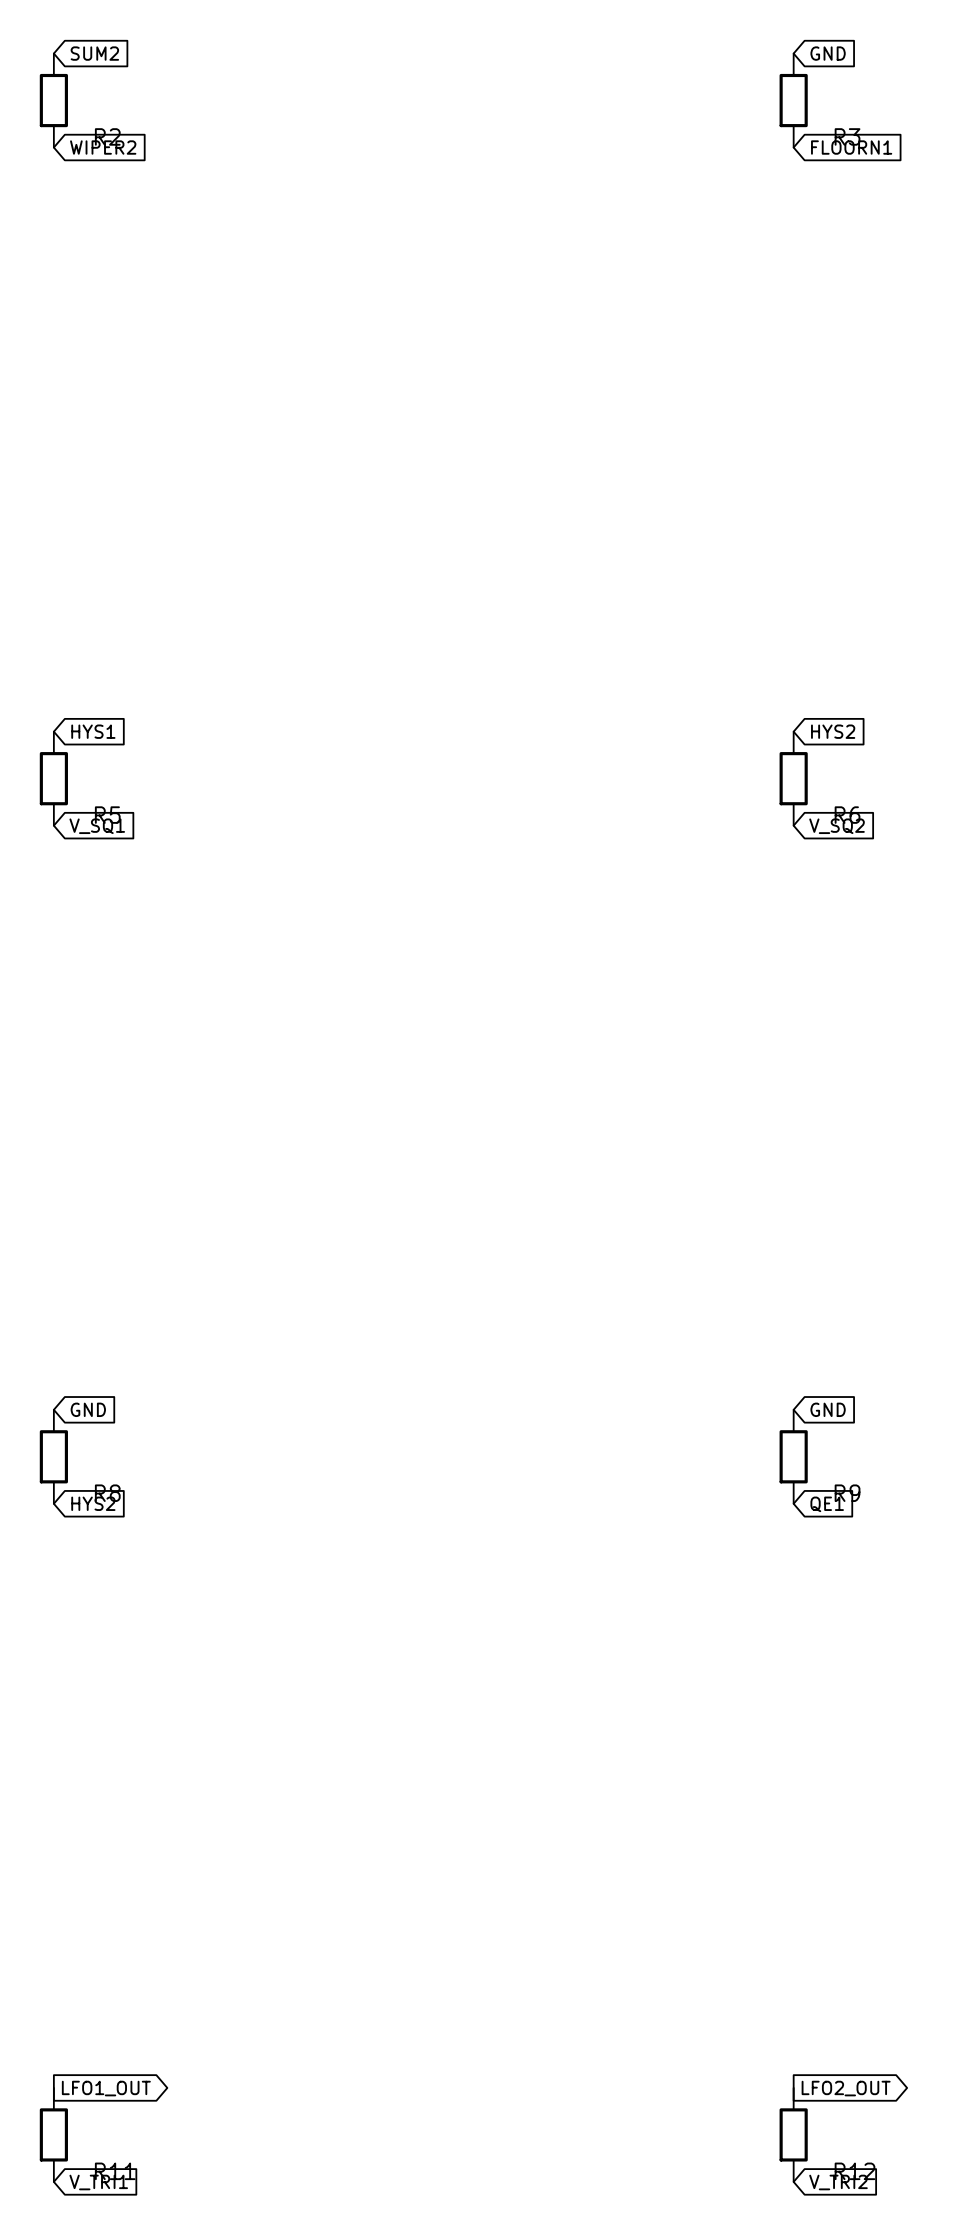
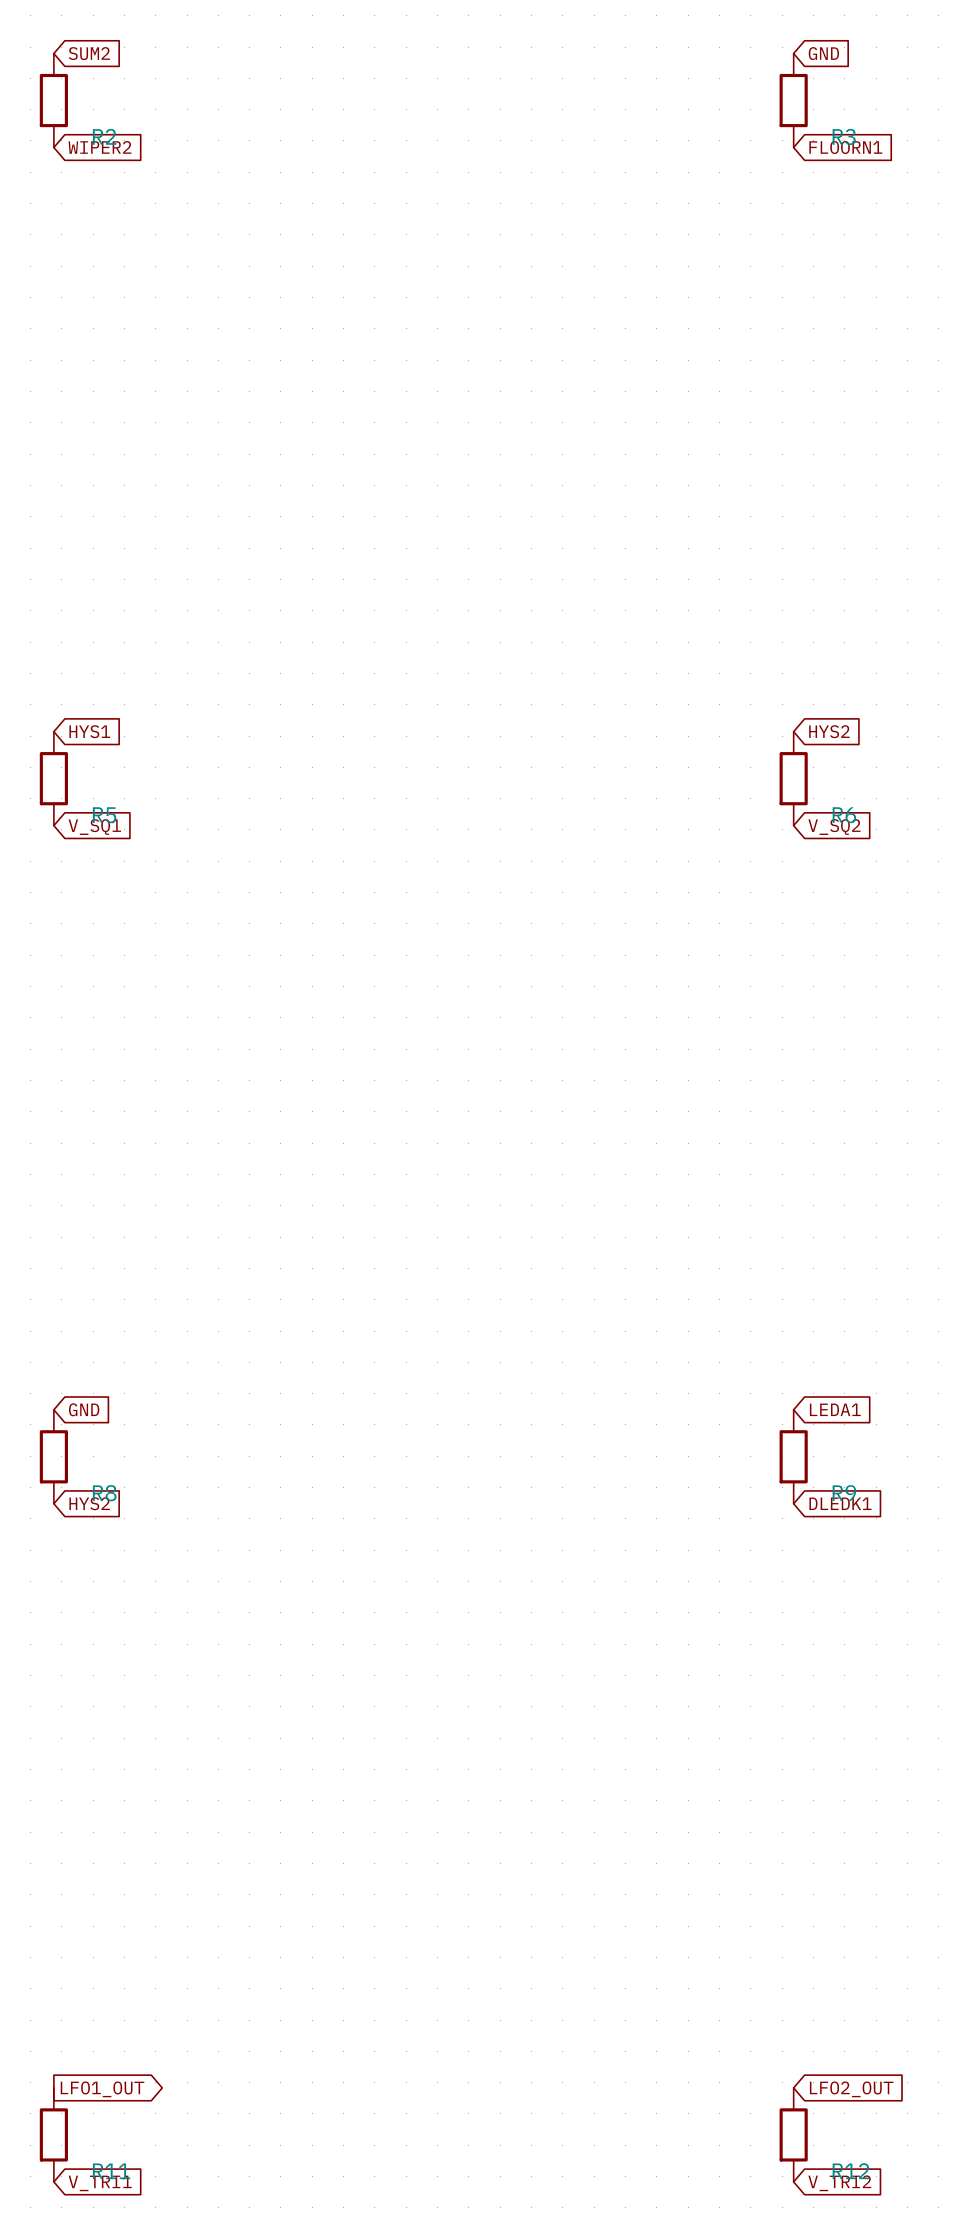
global label: GND (828, 1409) -> LEDA1 (835, 1409)
global label: QE1 (827, 1504) -> DLEDK1 (840, 1503)
global label shape: output (846, 2088) -> input (851, 2089)

